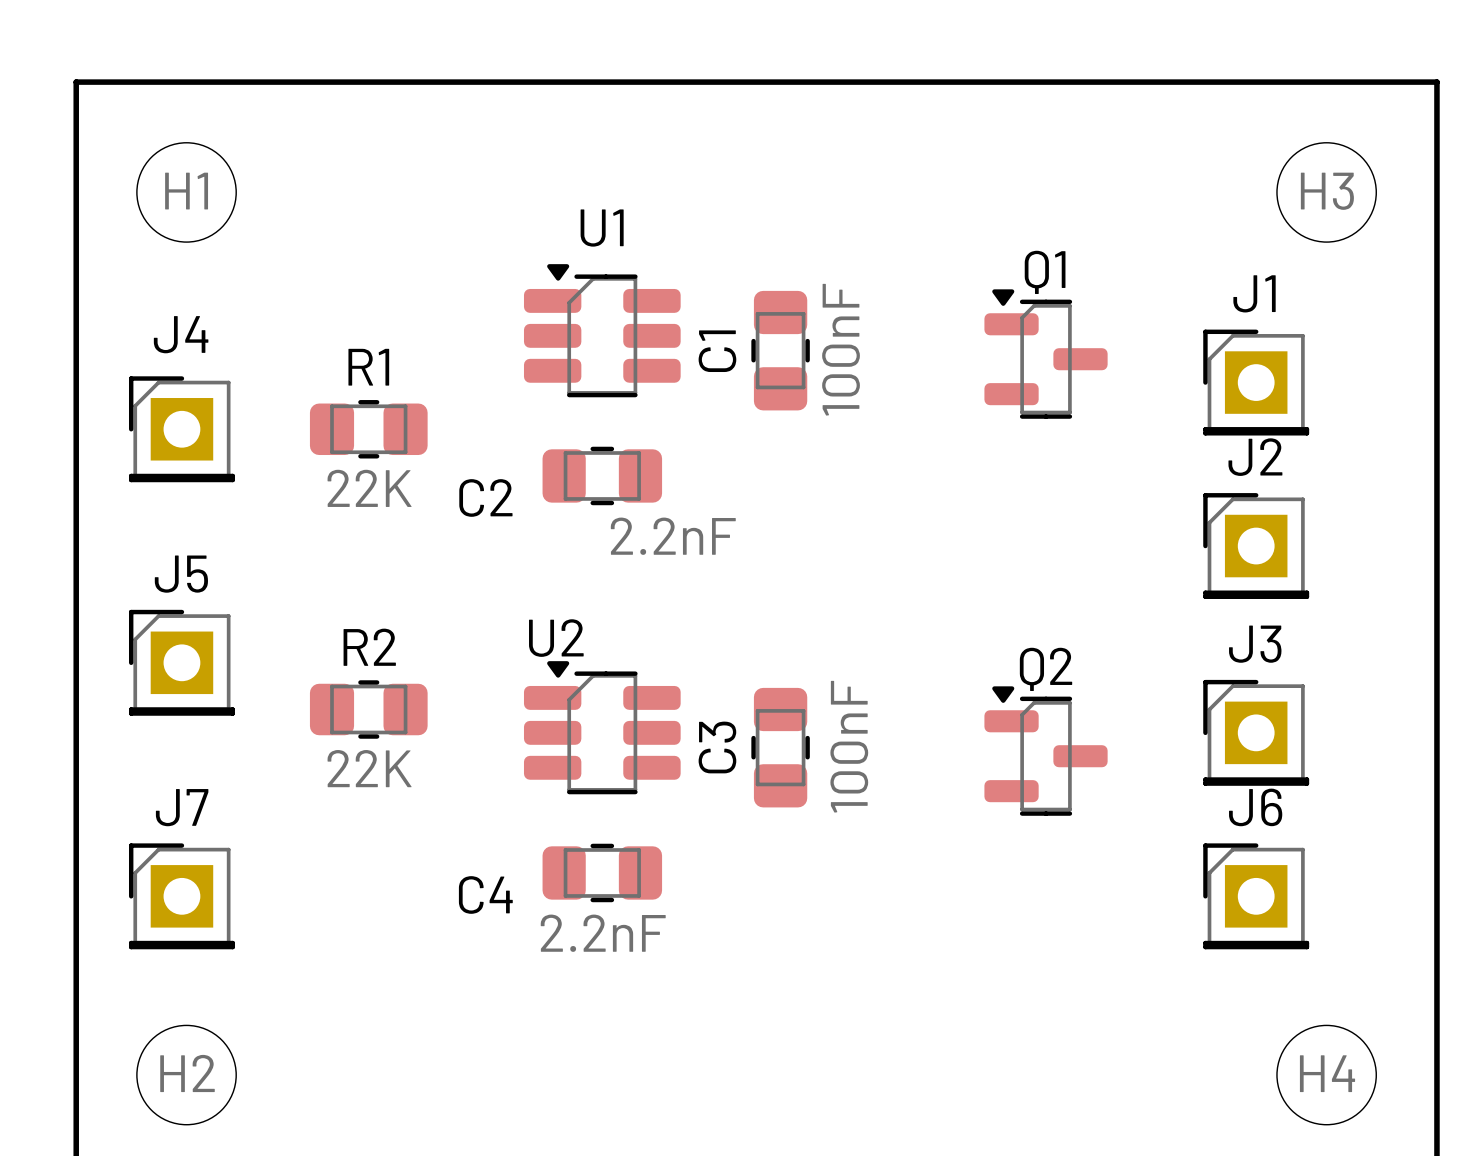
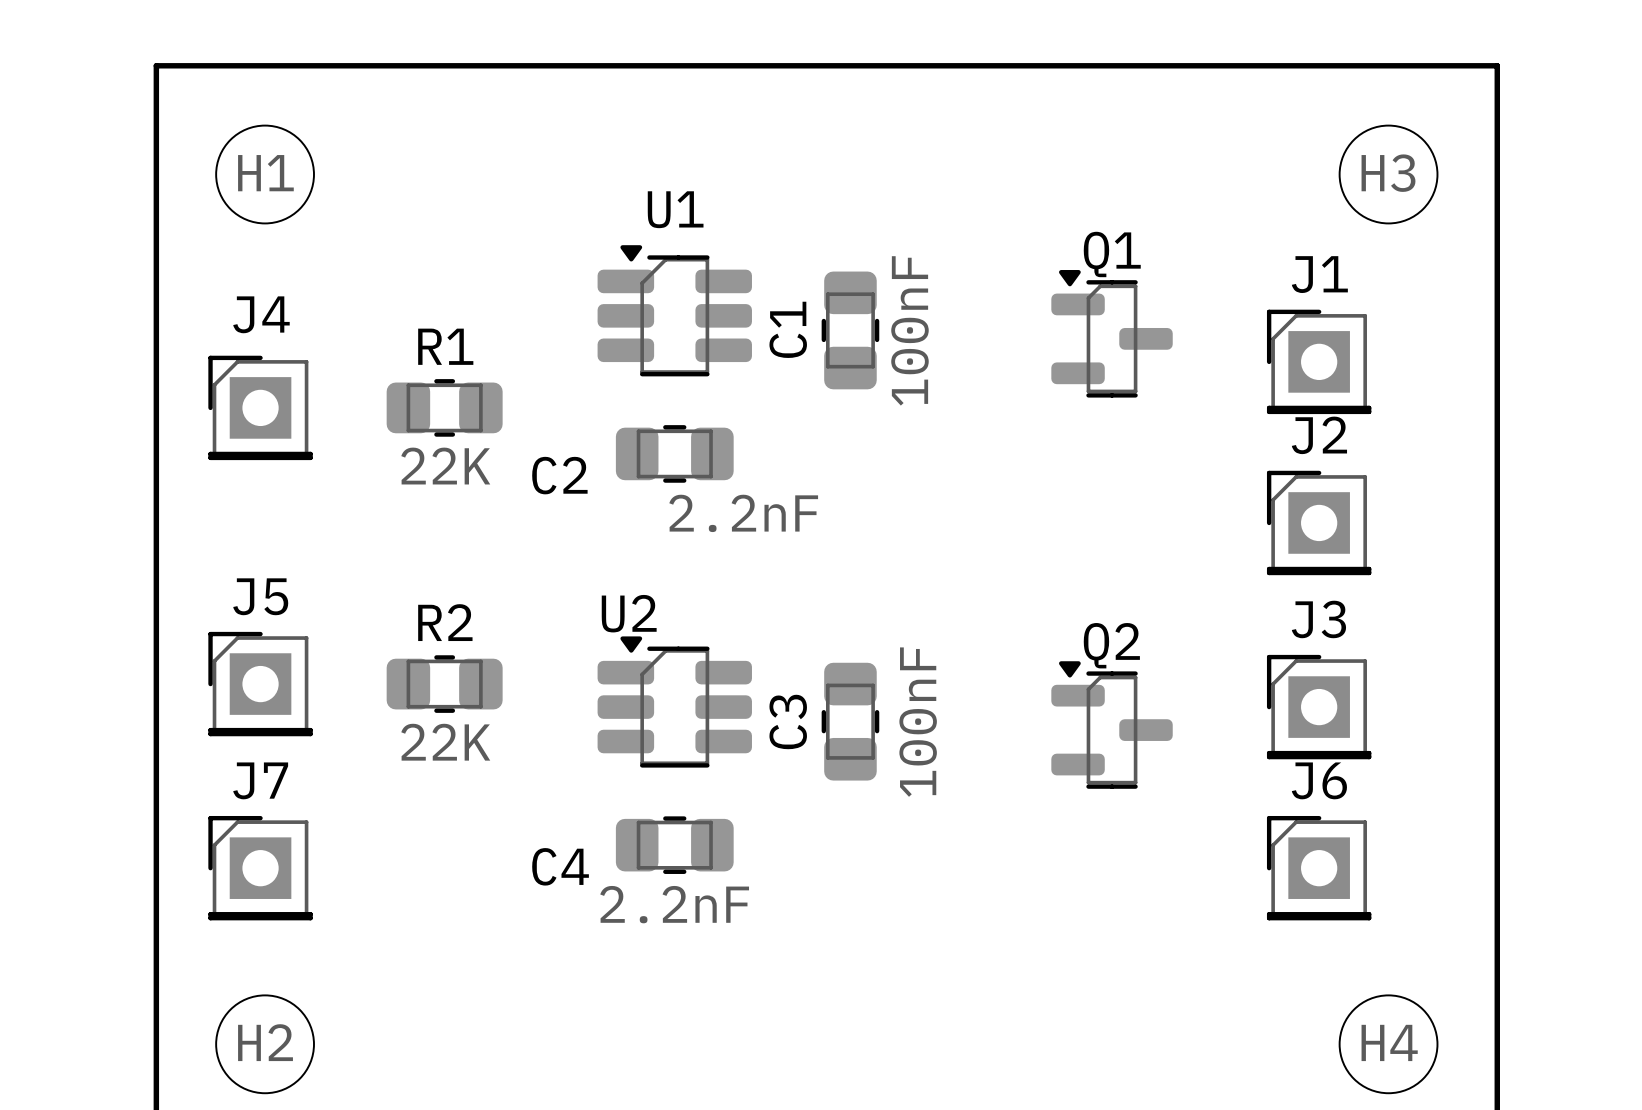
J5 position: (181, 662) -> (260, 684)

